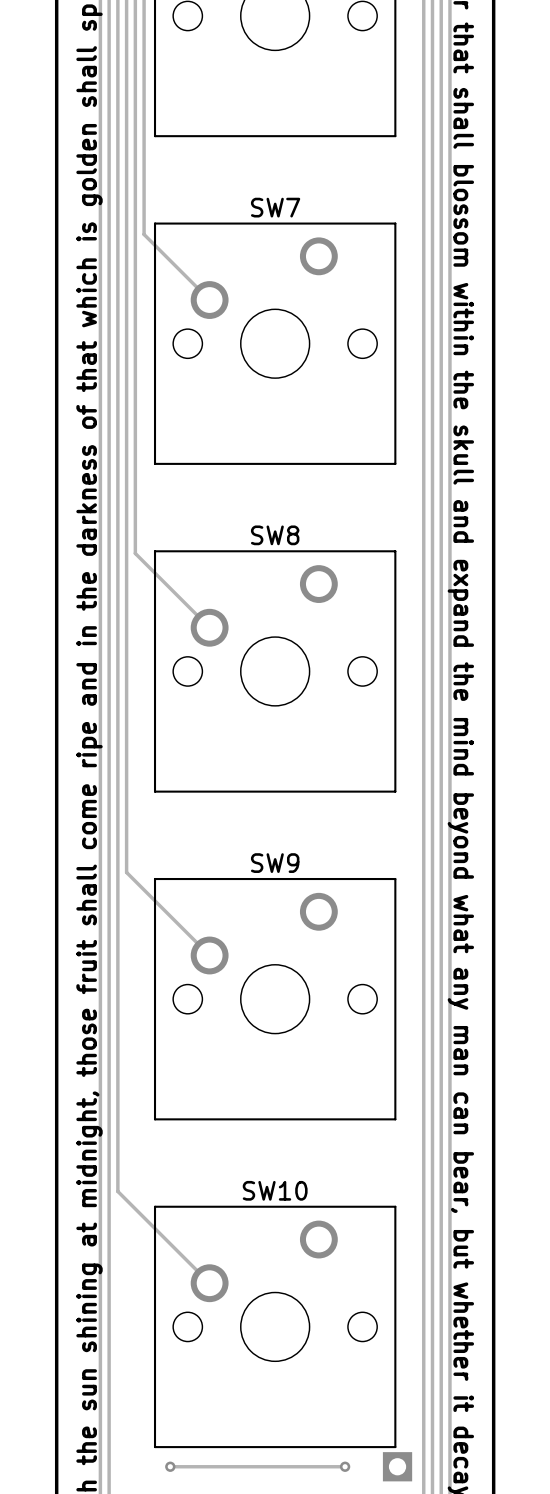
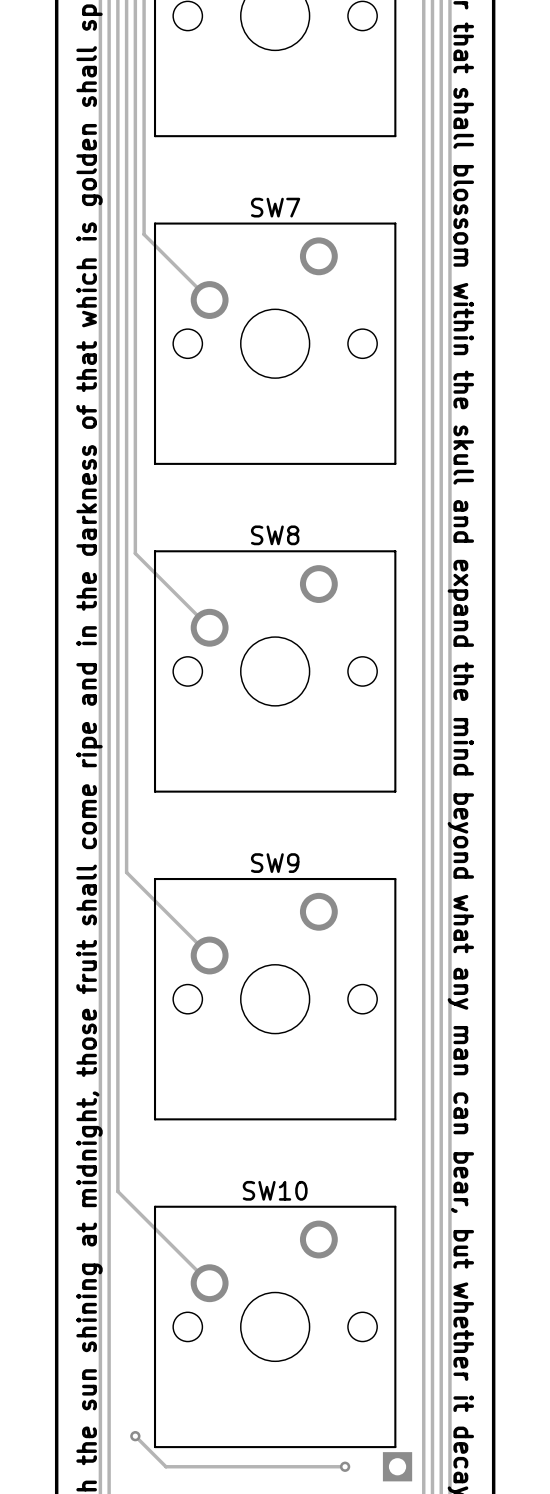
track: none -> (135, 1436) (165, 1466) (170, 1466)
via position: (170, 1466) -> (135, 1436)

